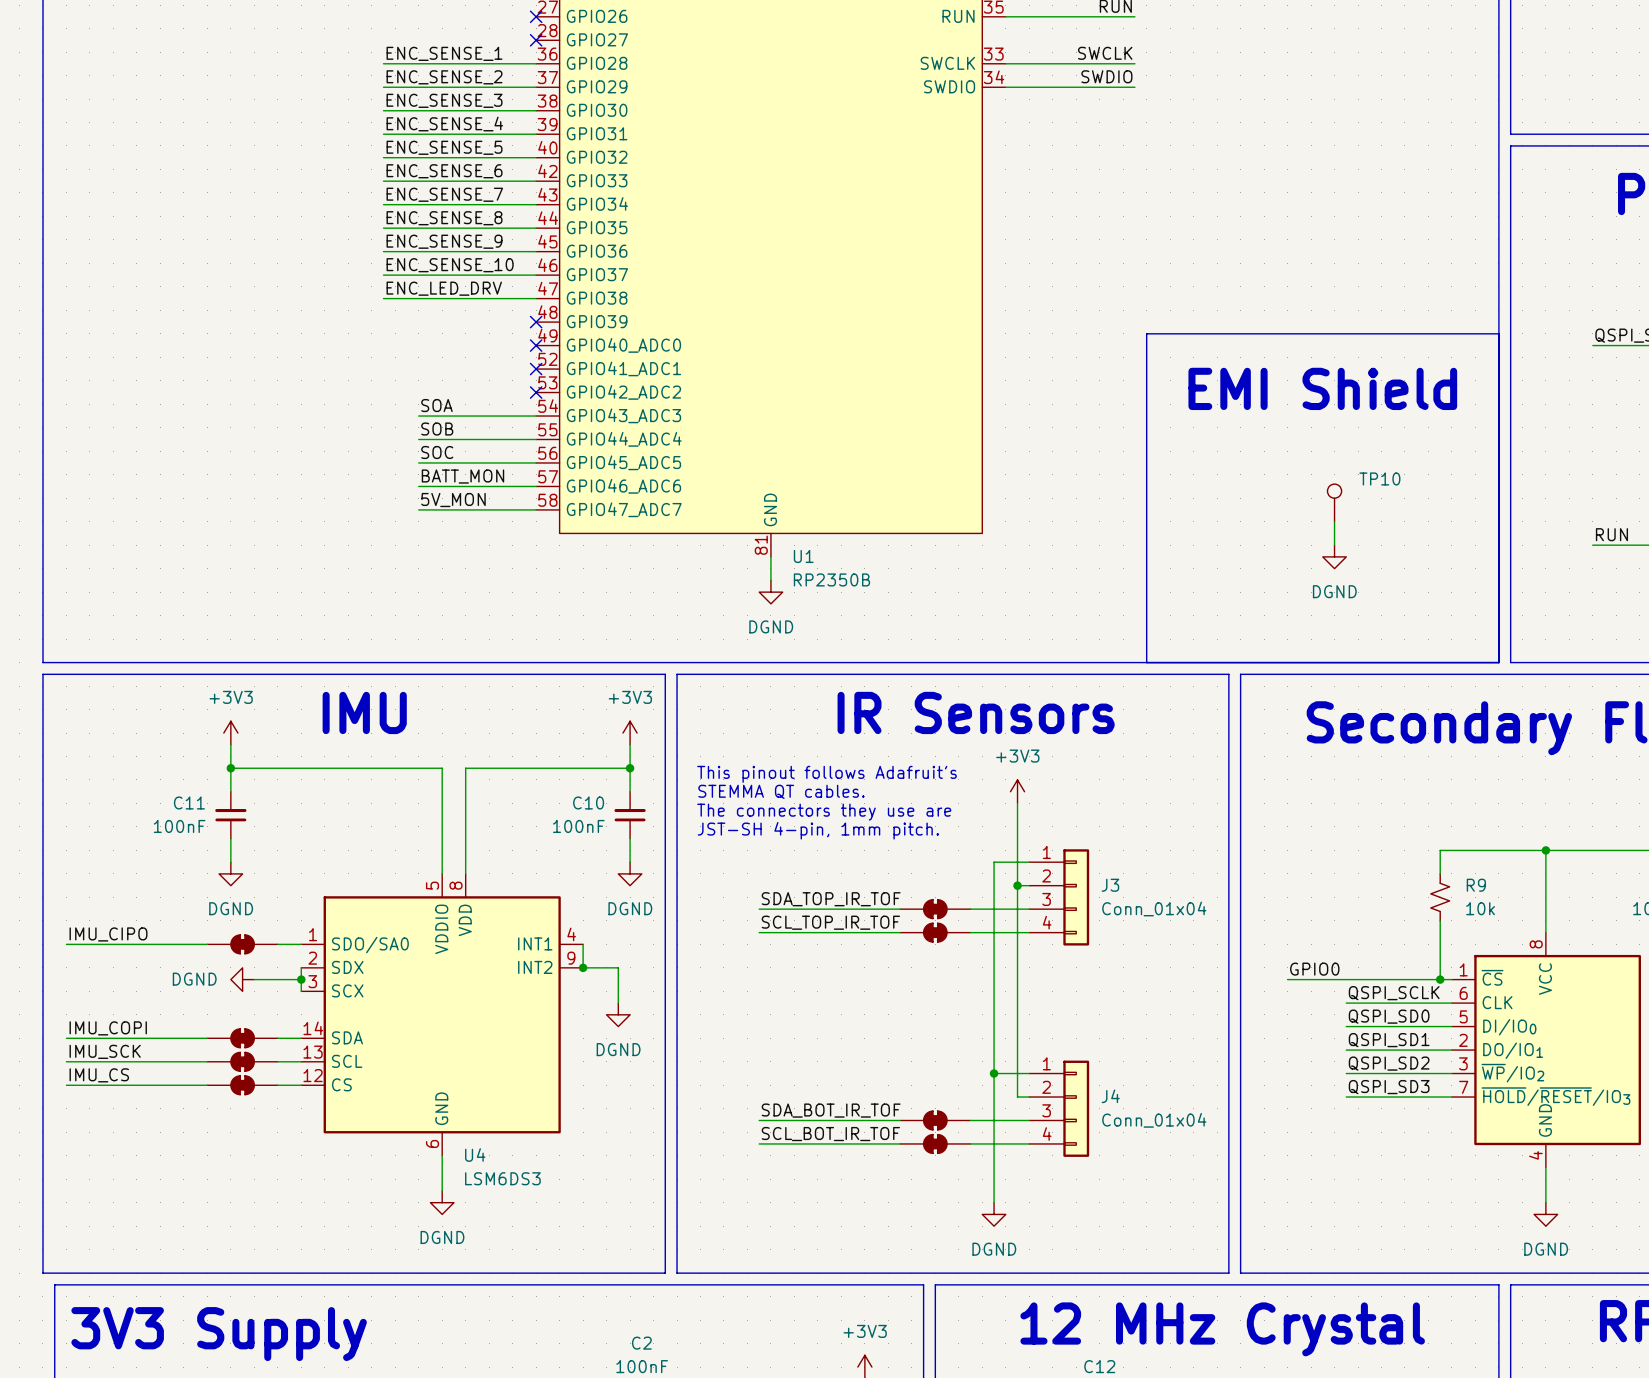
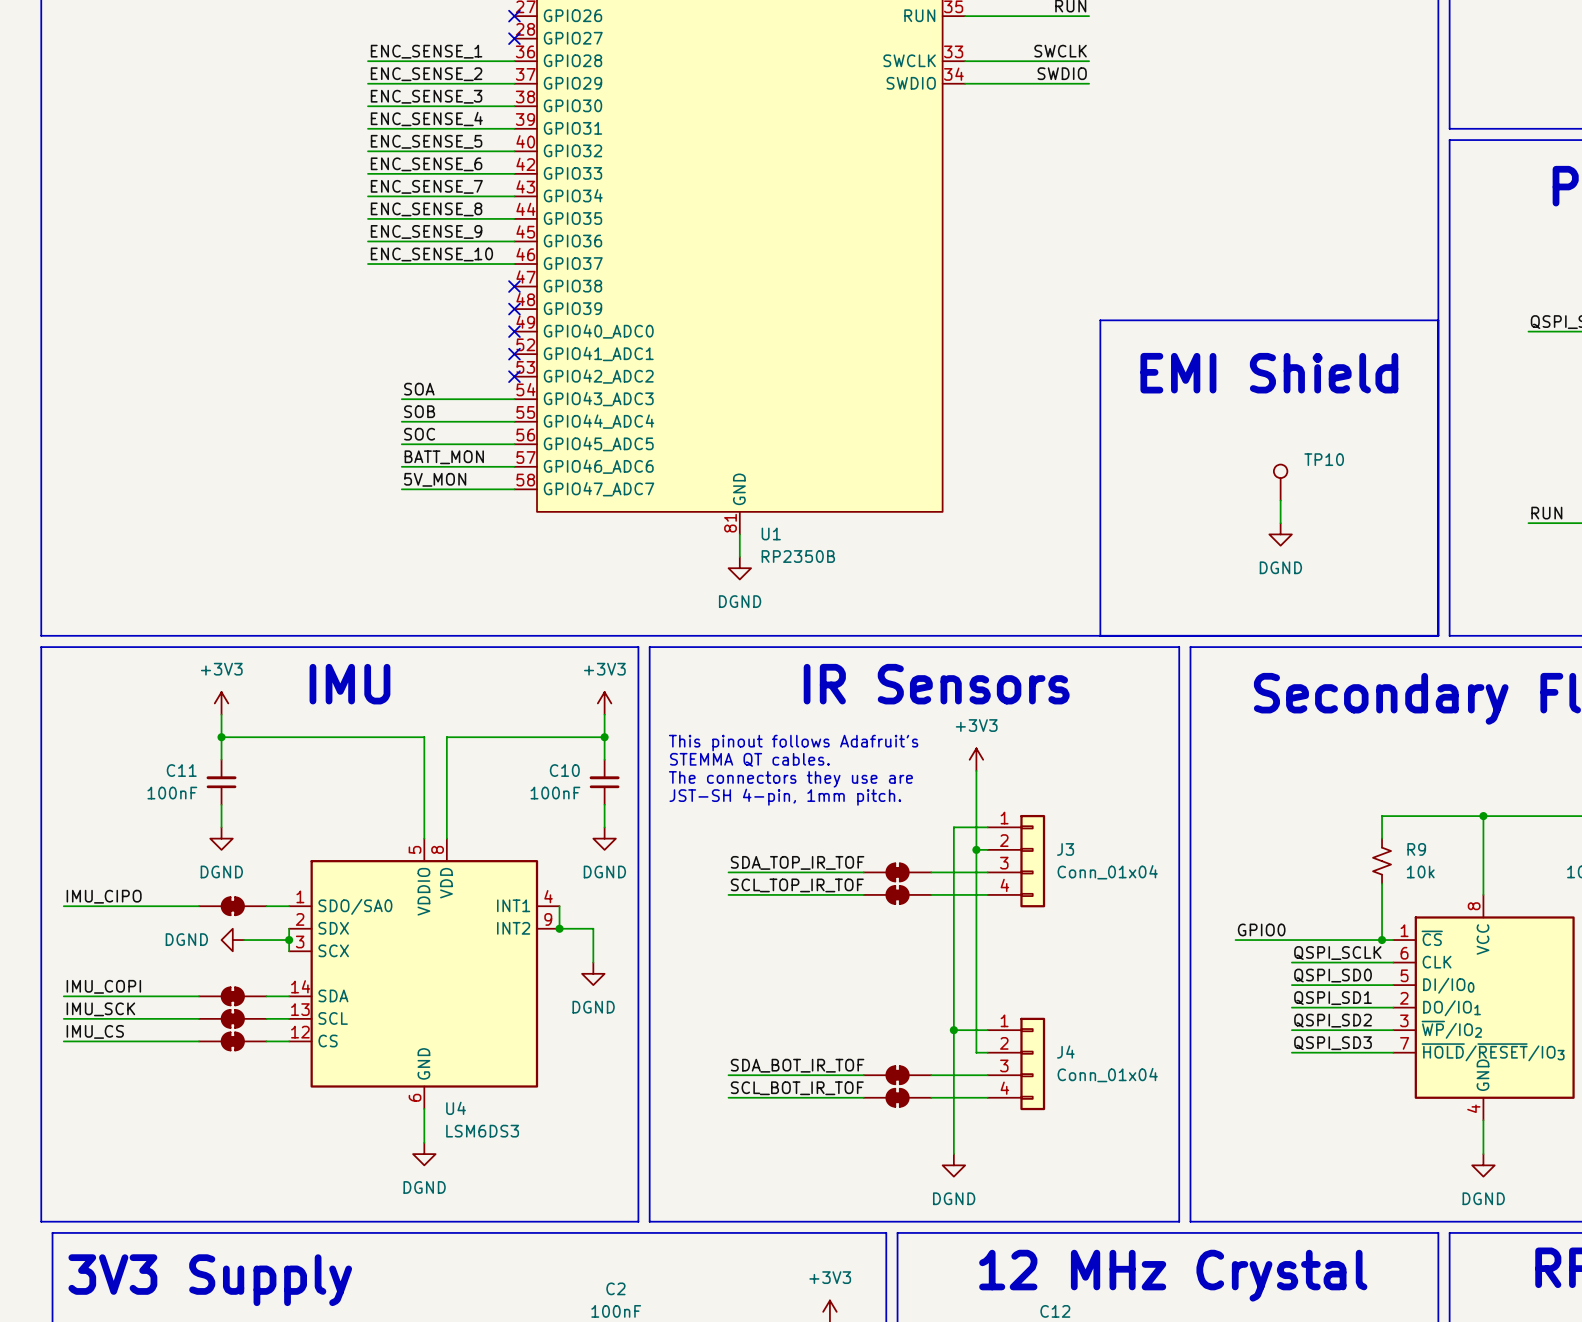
label: ENC_LED_DRV (444, 288) -> none
wire: (383, 298) (536, 298) -> none
no-connect mark: none -> (514, 286)

